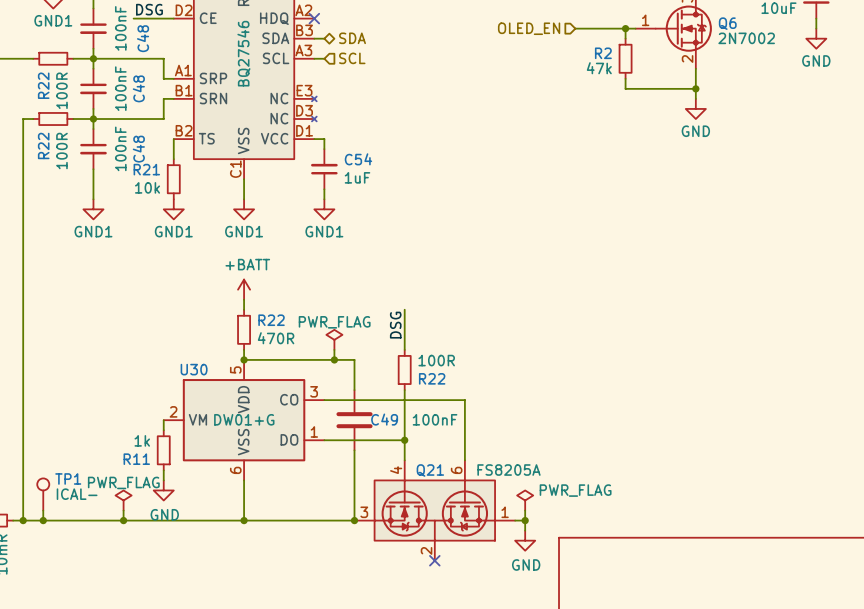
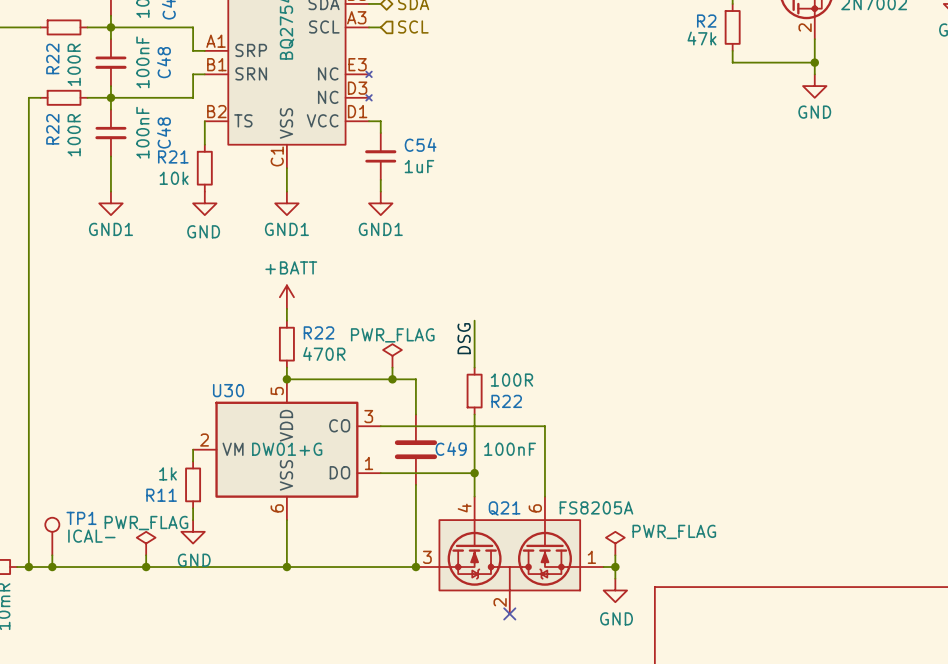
power symbol: GND1 (173, 209) -> GND (204, 203)

